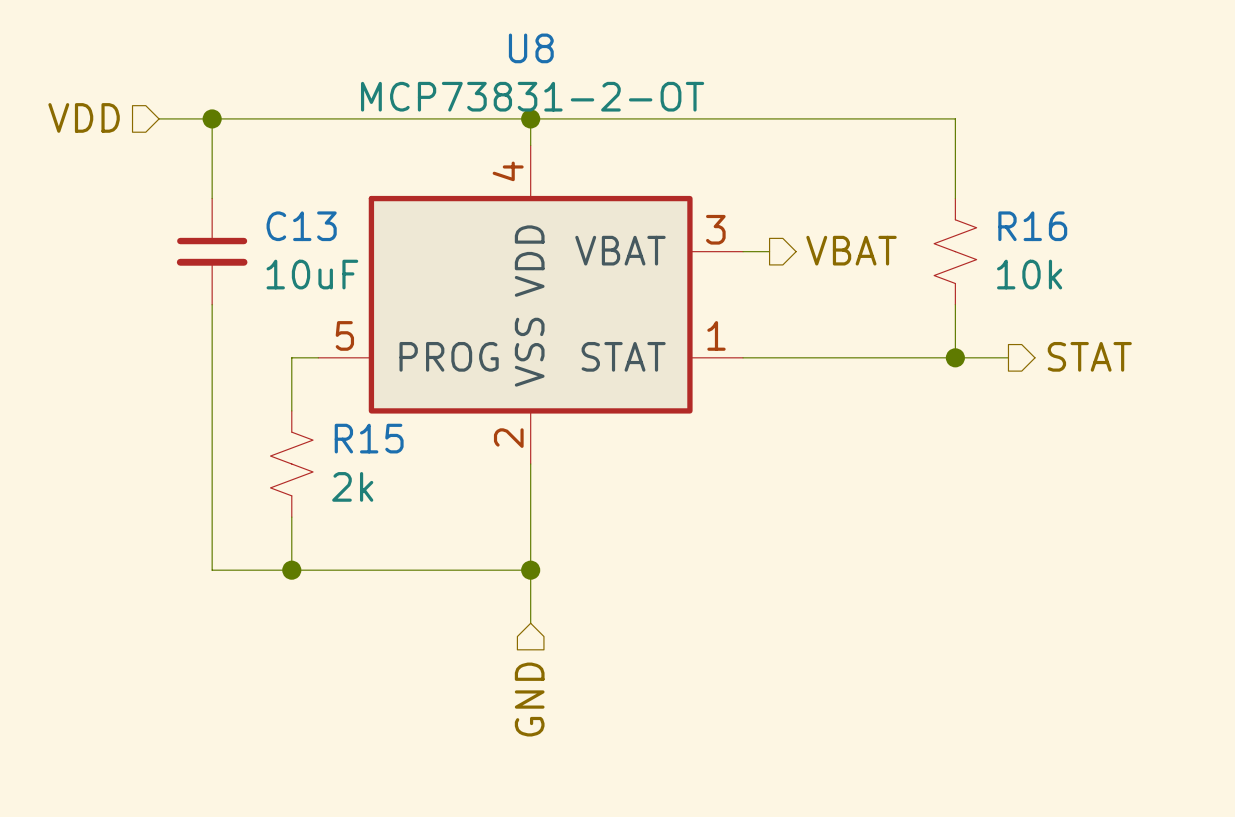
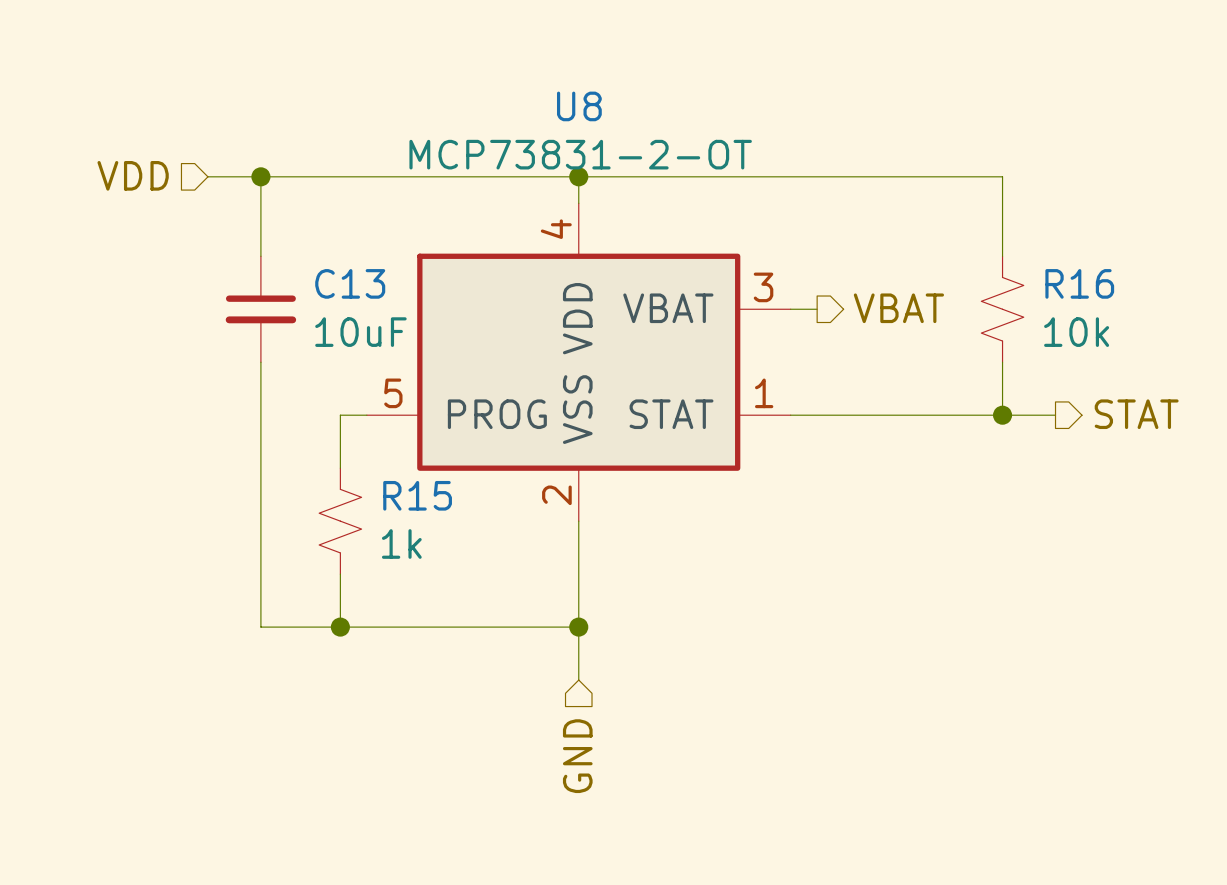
R15 value: 2k (352, 486) -> 1k (401, 543)

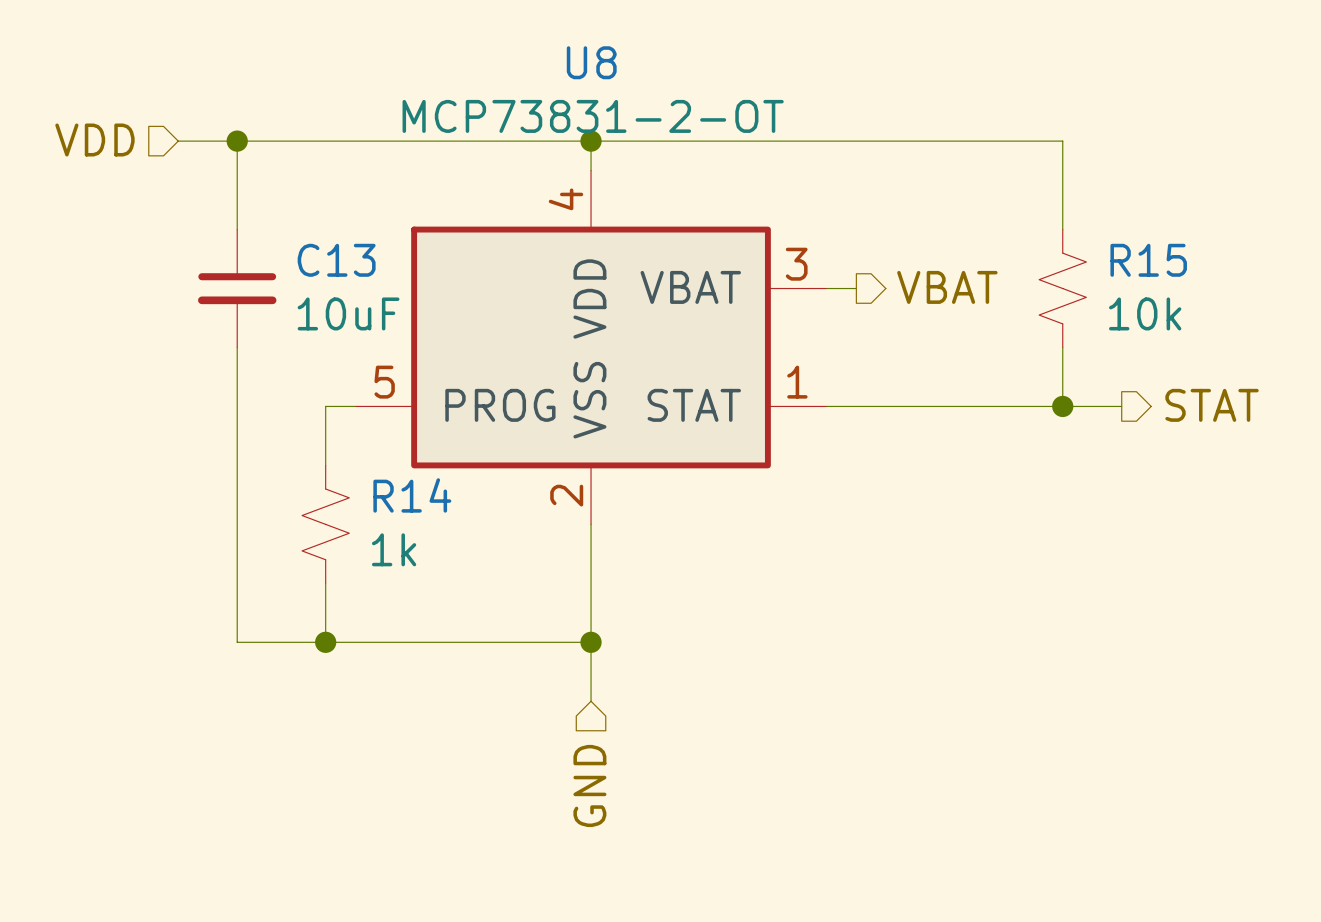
R16 name: R16 (1079, 283) -> R15 (1148, 260)
R15 name: R15 (417, 495) -> R14 (412, 495)

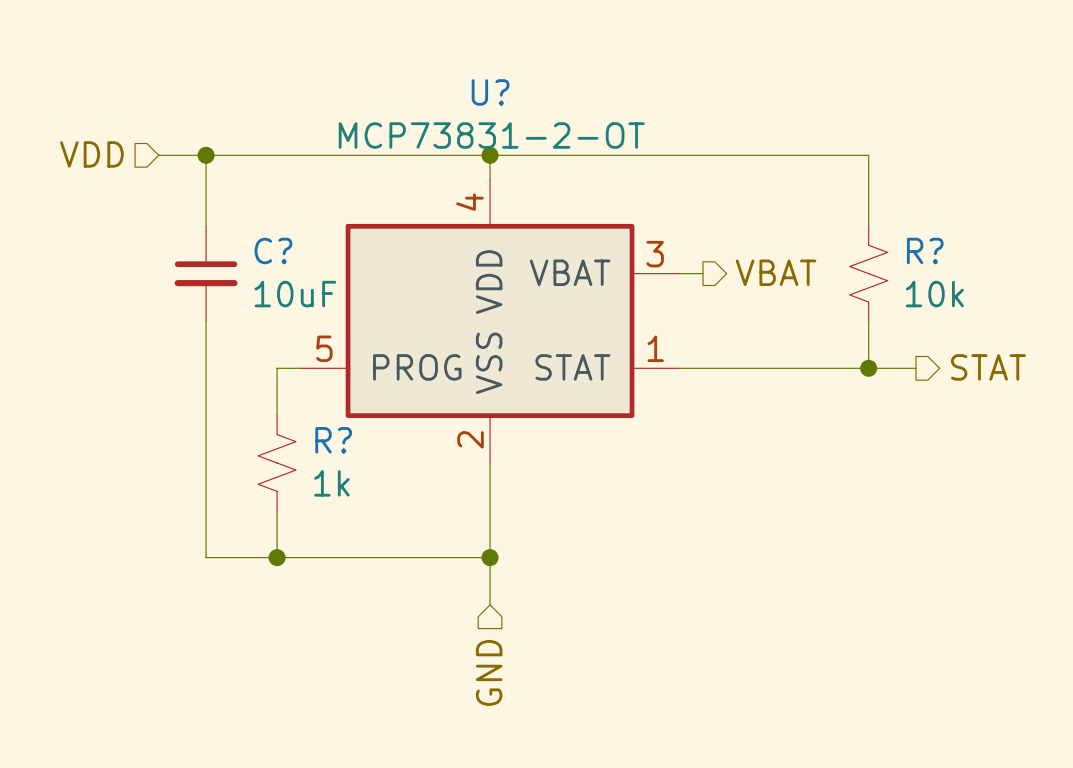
U8 name: U8 (591, 62) -> U? (490, 92)
C13 name: C13 (336, 260) -> C? (273, 250)
R15 name: R15 (1148, 260) -> R? (925, 250)
R14 name: R14 (412, 495) -> R? (333, 440)

